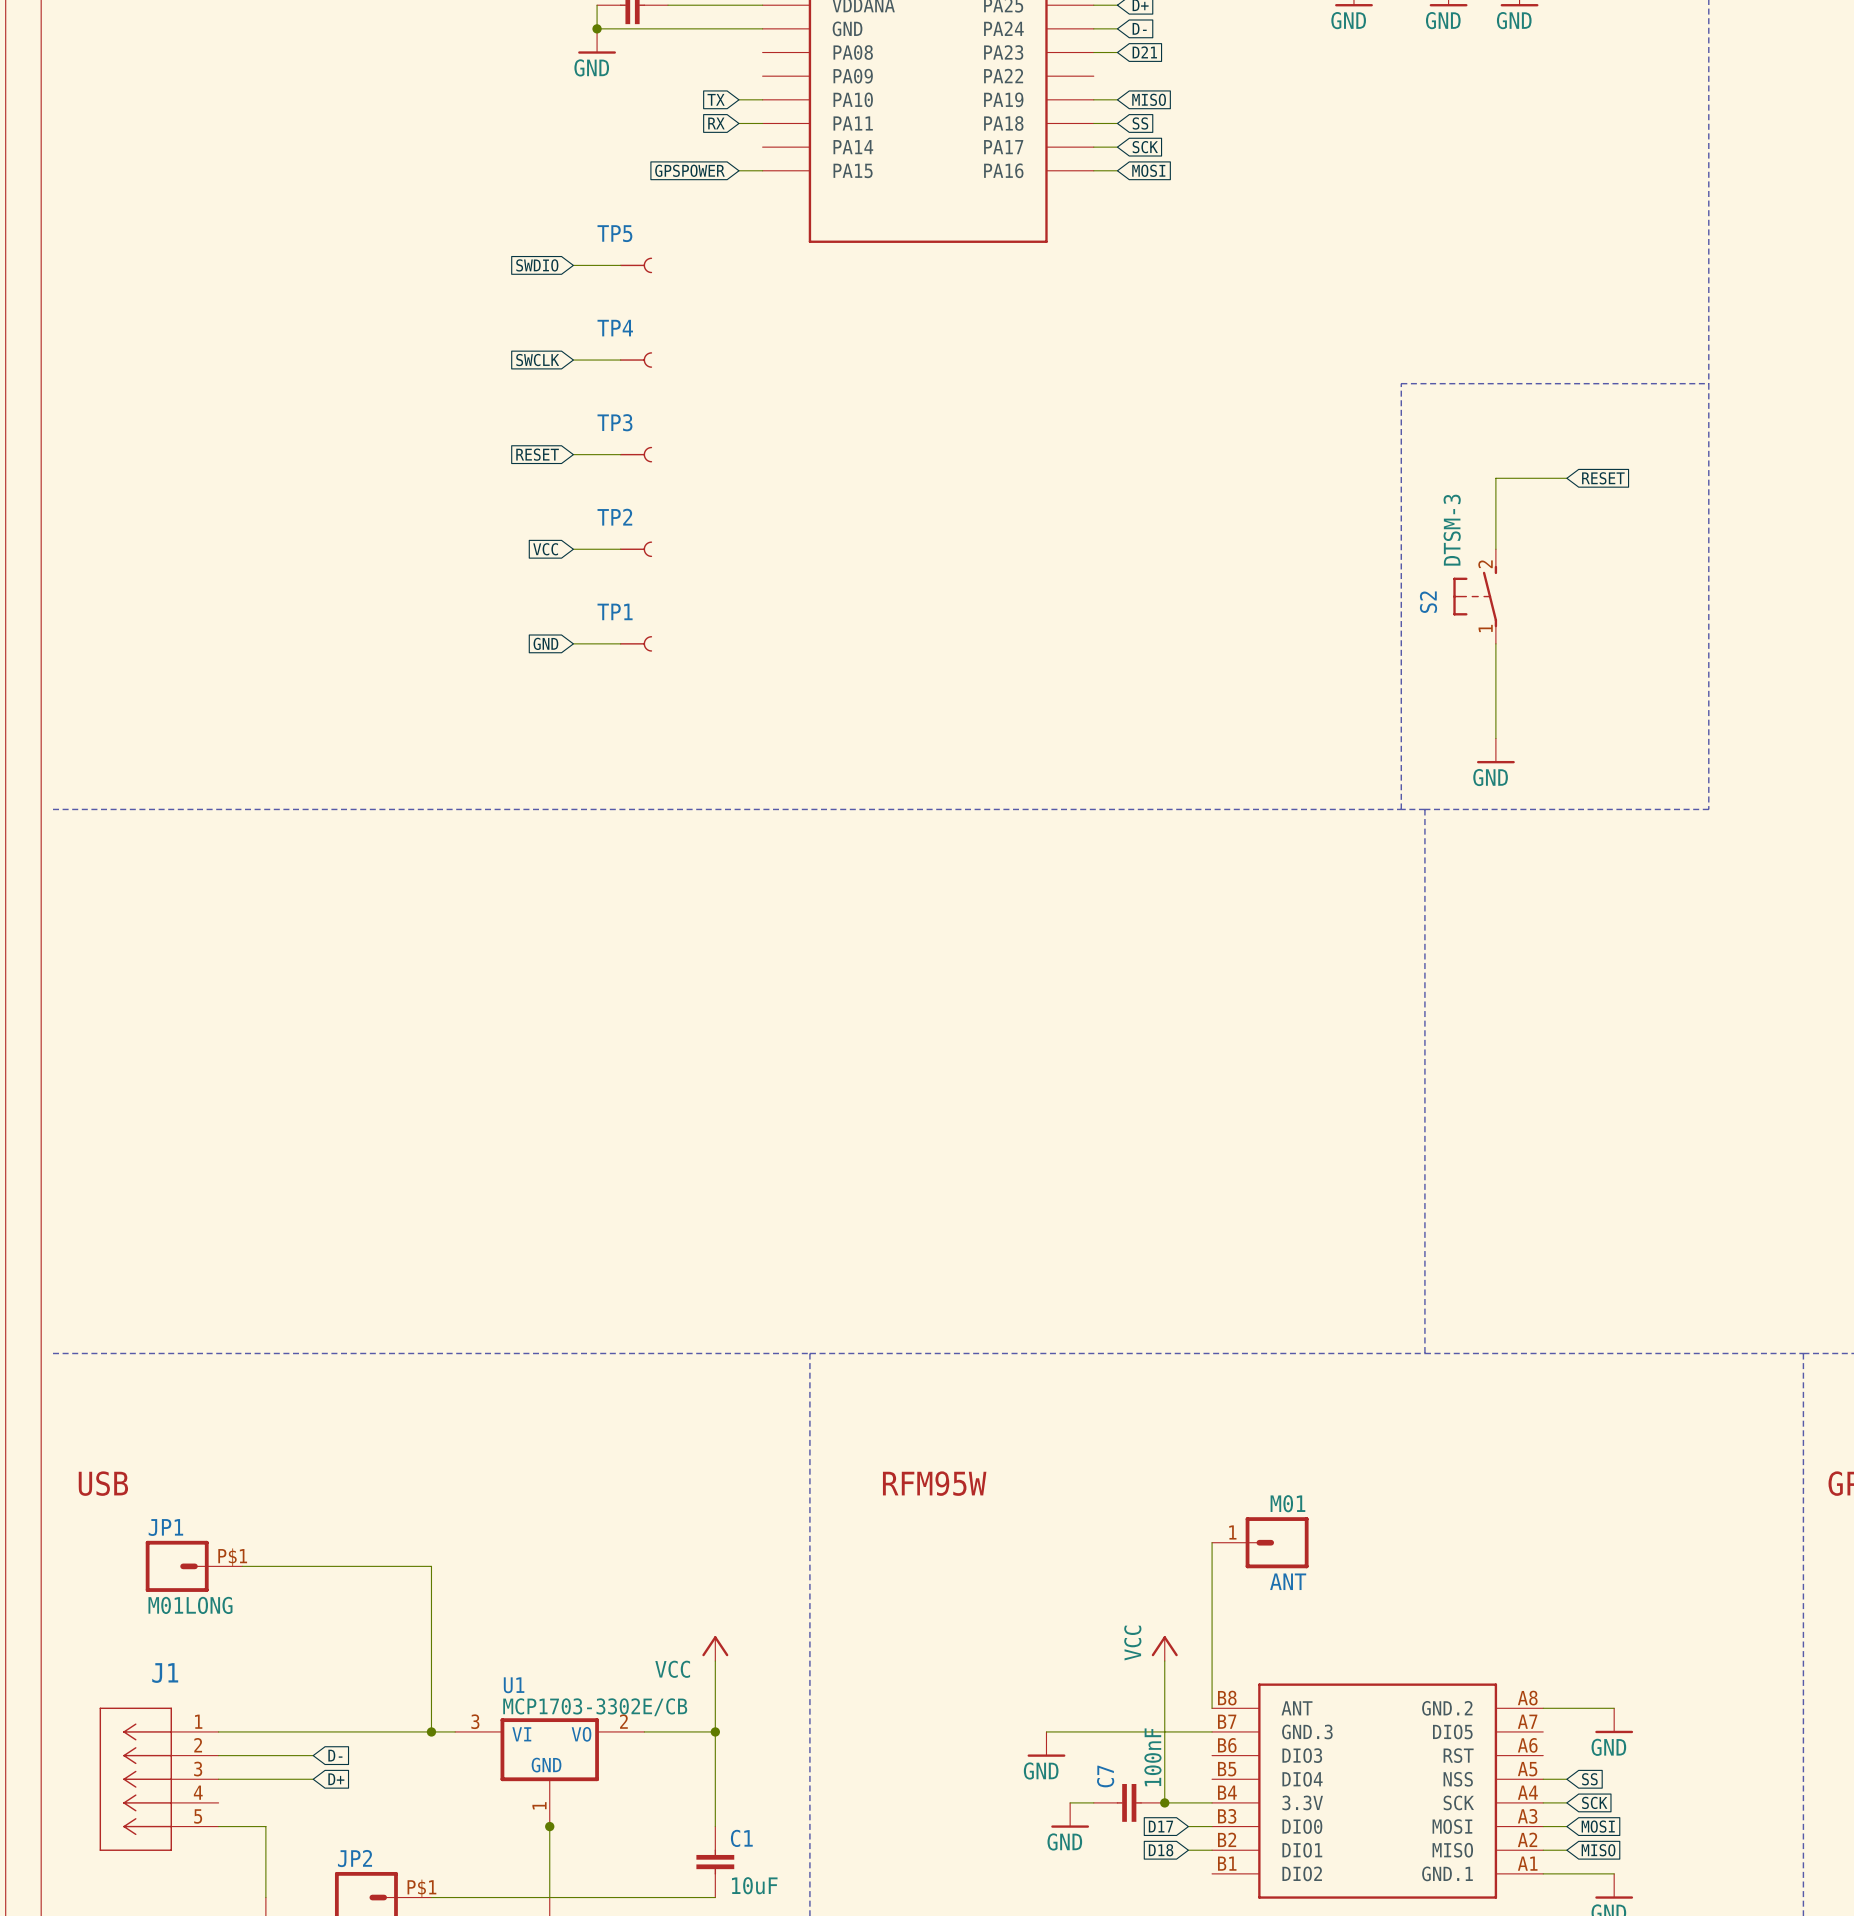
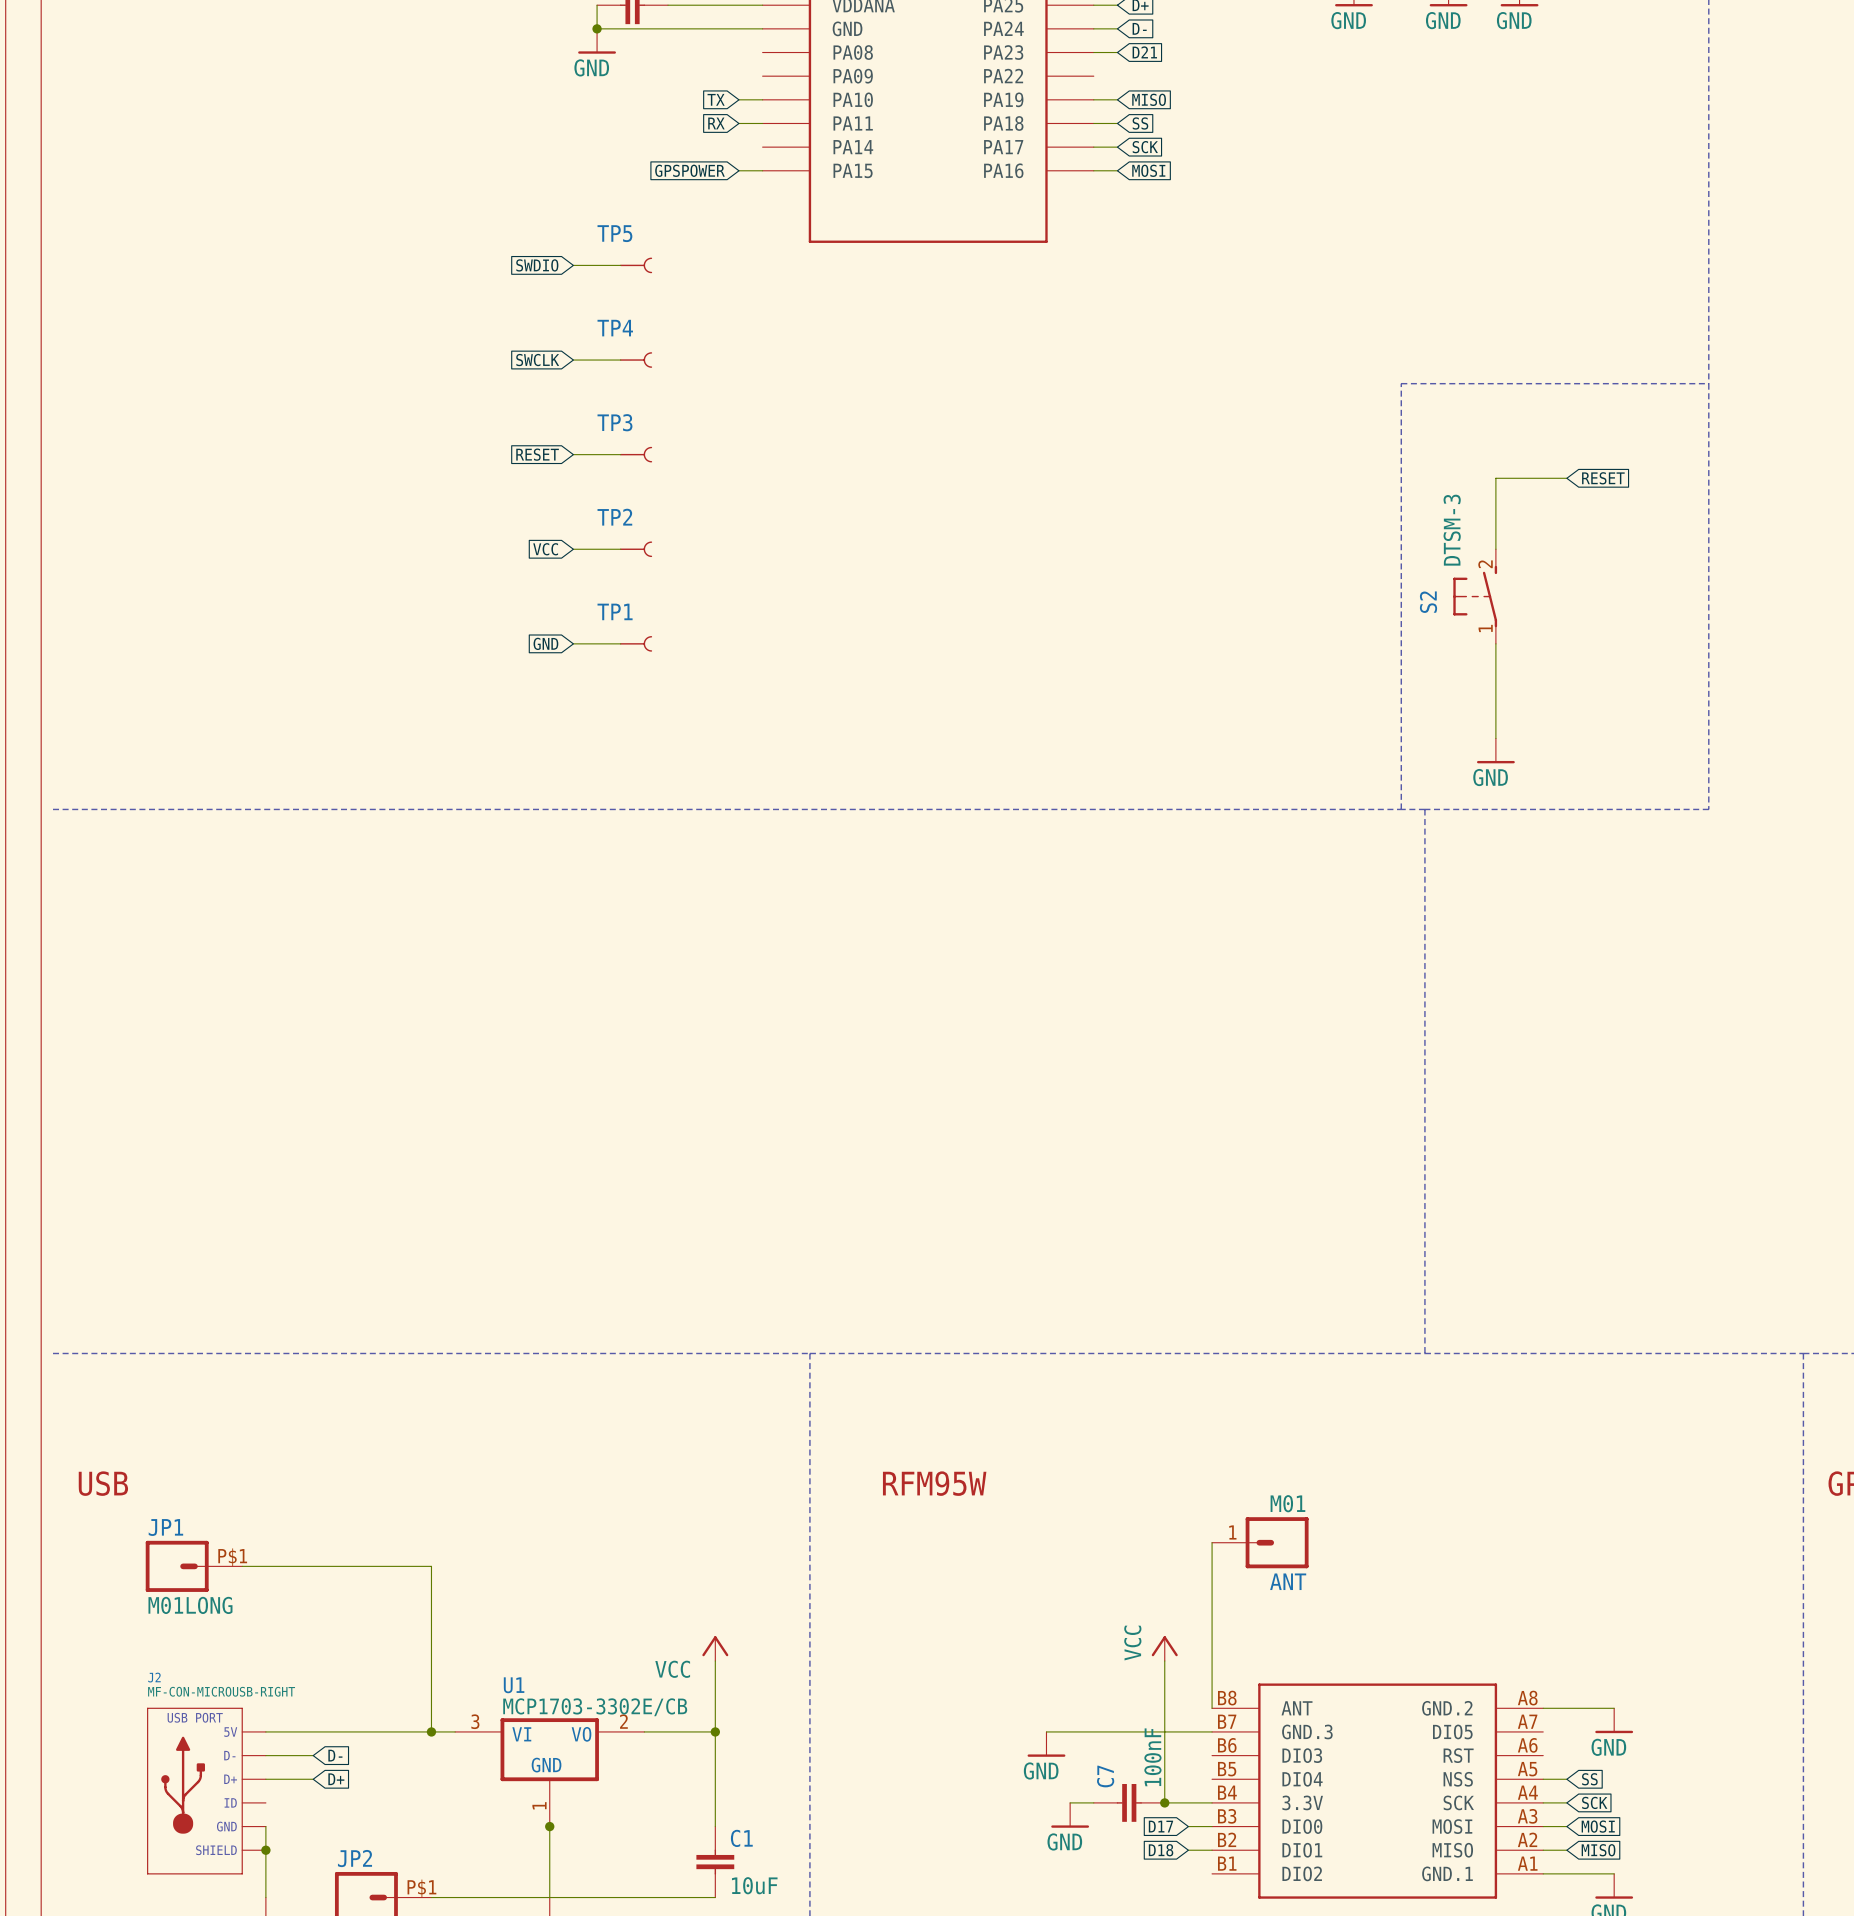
J1: (159, 1779) -> none
J2: none -> MF-CON-MICROUSB-RIGHT (206, 1791)
junction: none -> (265, 1850)

